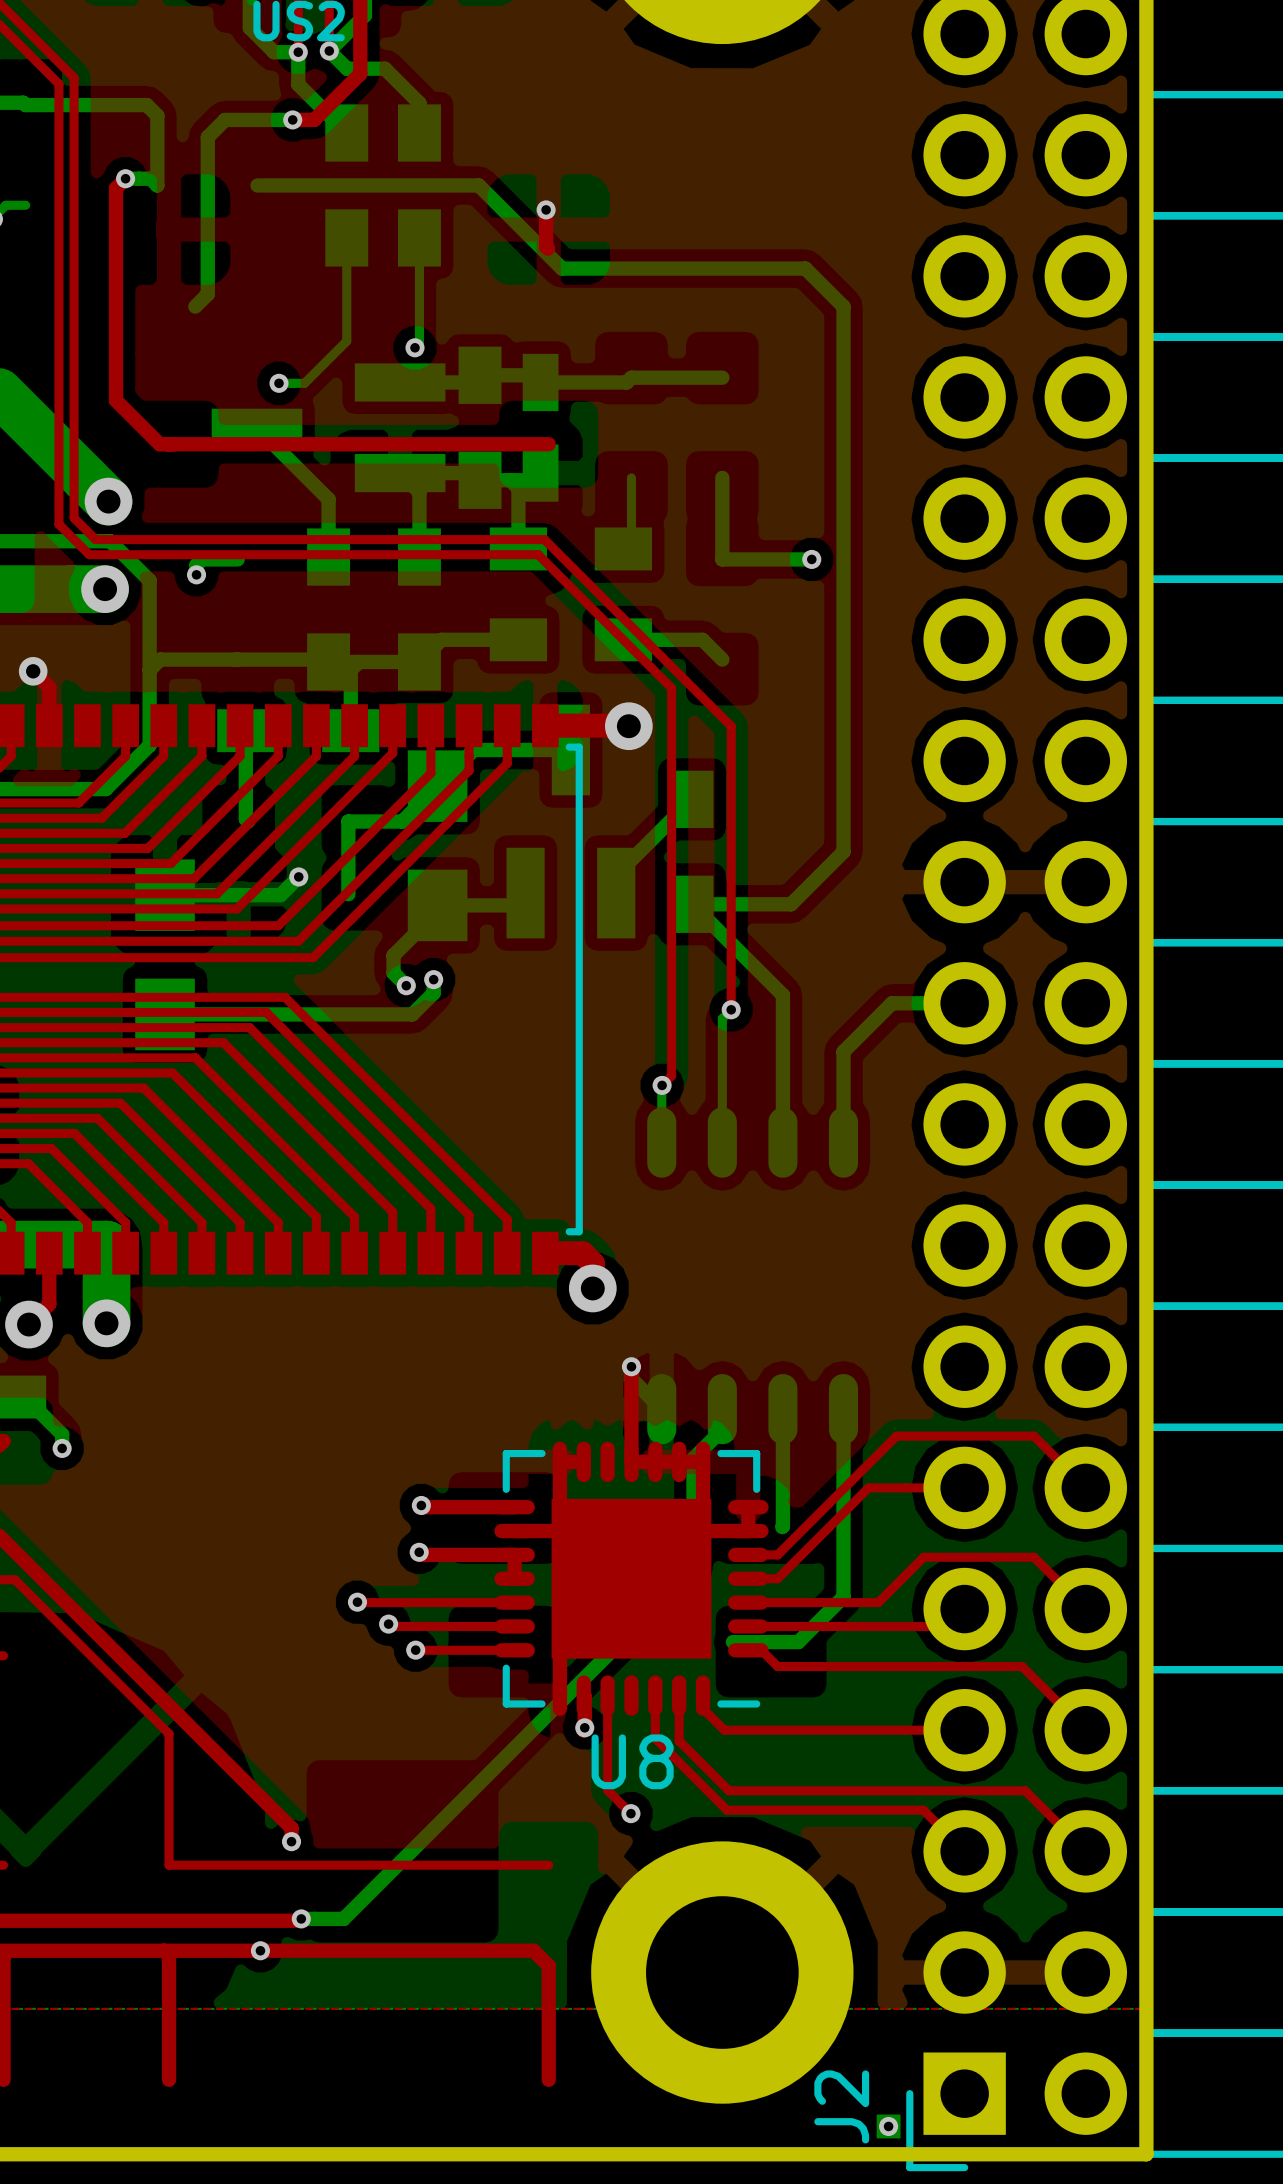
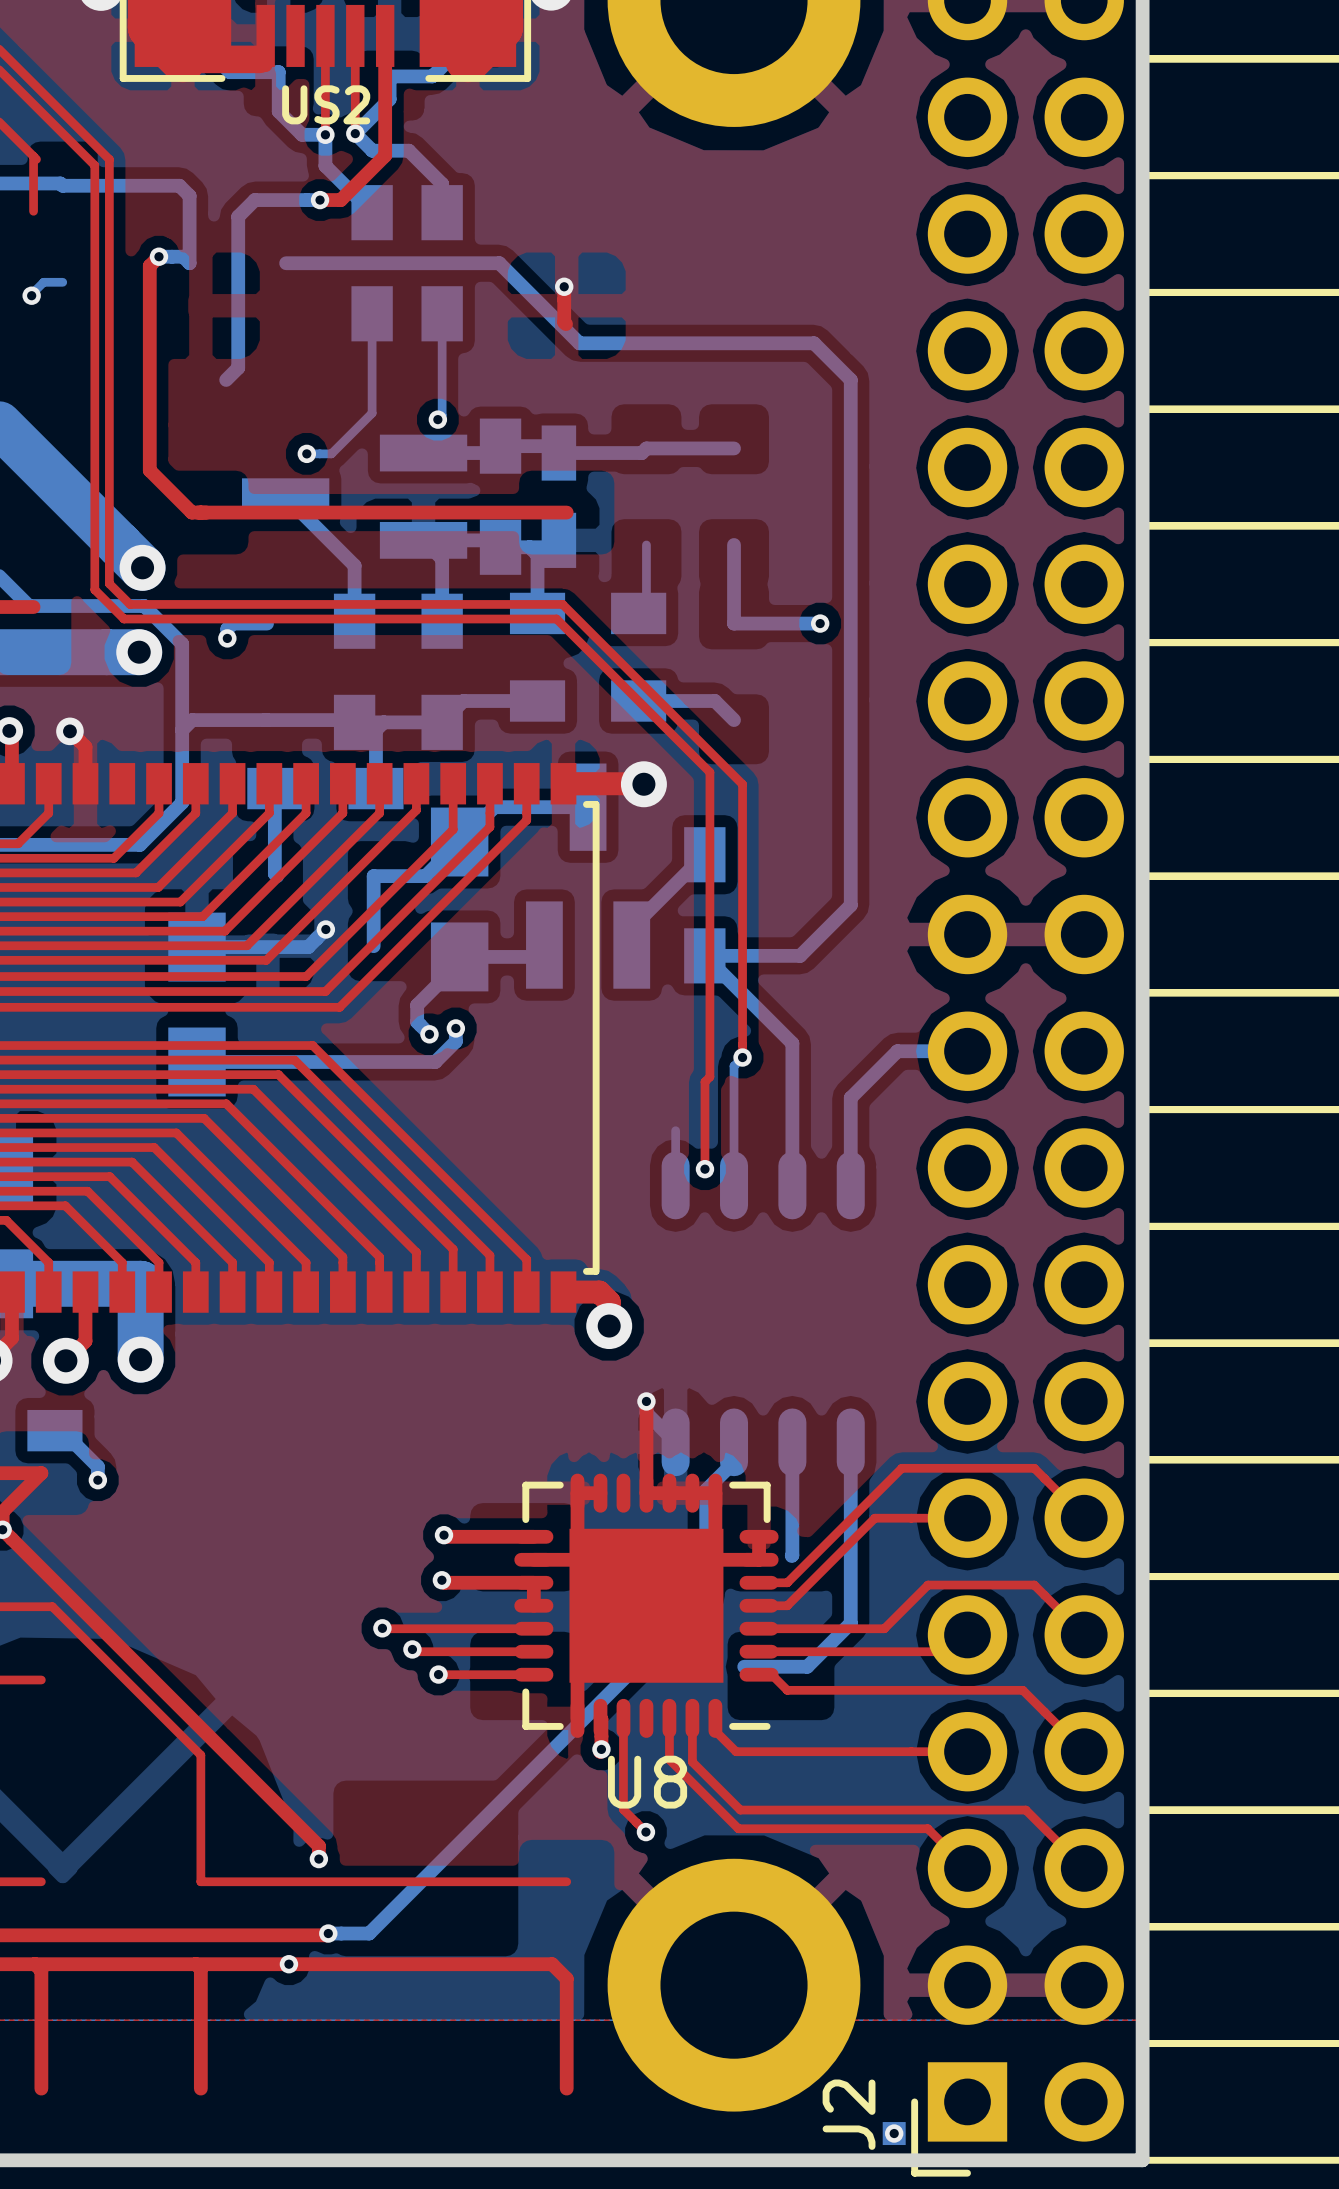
top track: (671, 688) (671, 1075) (662, 1085) -> (685, 747) (709, 772) (709, 1076) (704, 1081) (704, 1169)
via position: (662, 1085) -> (704, 1169)

